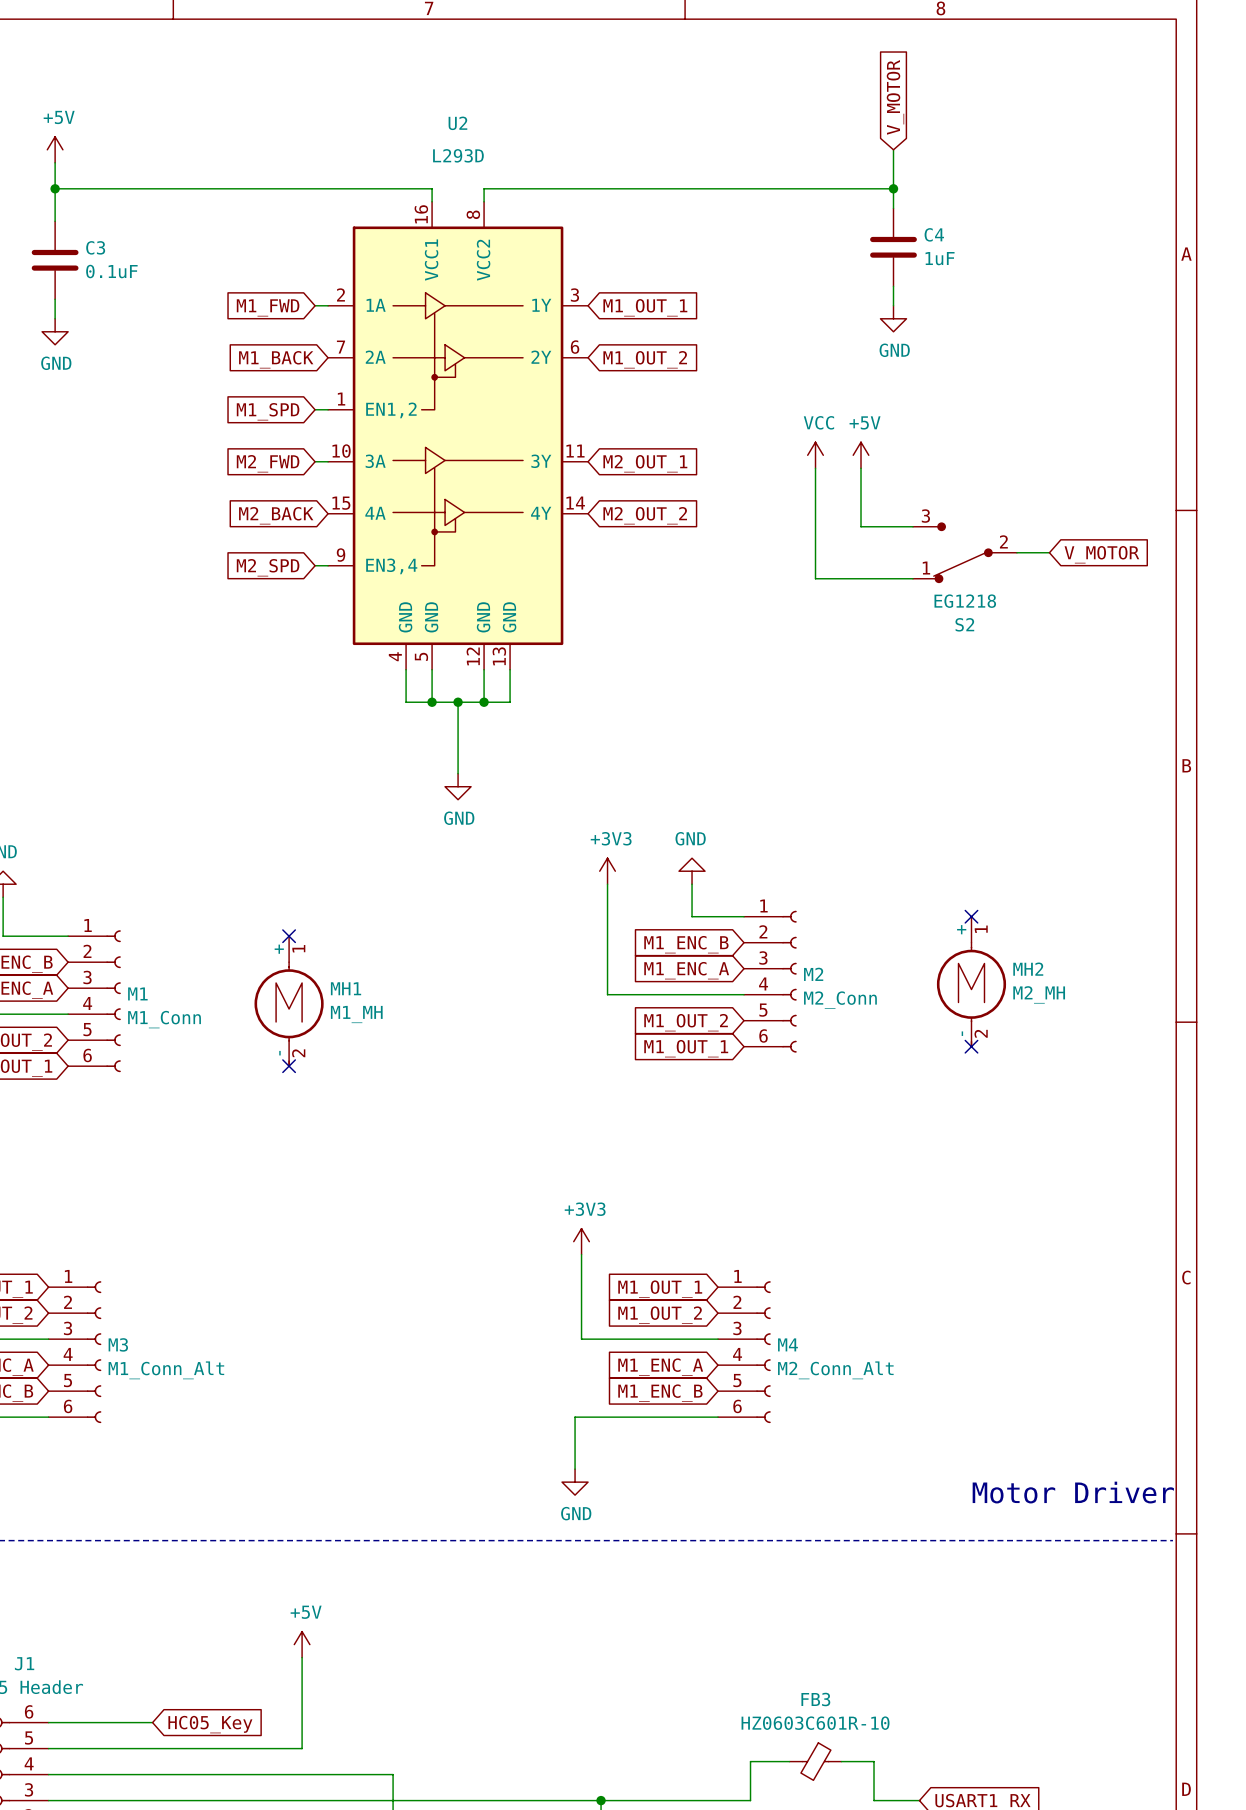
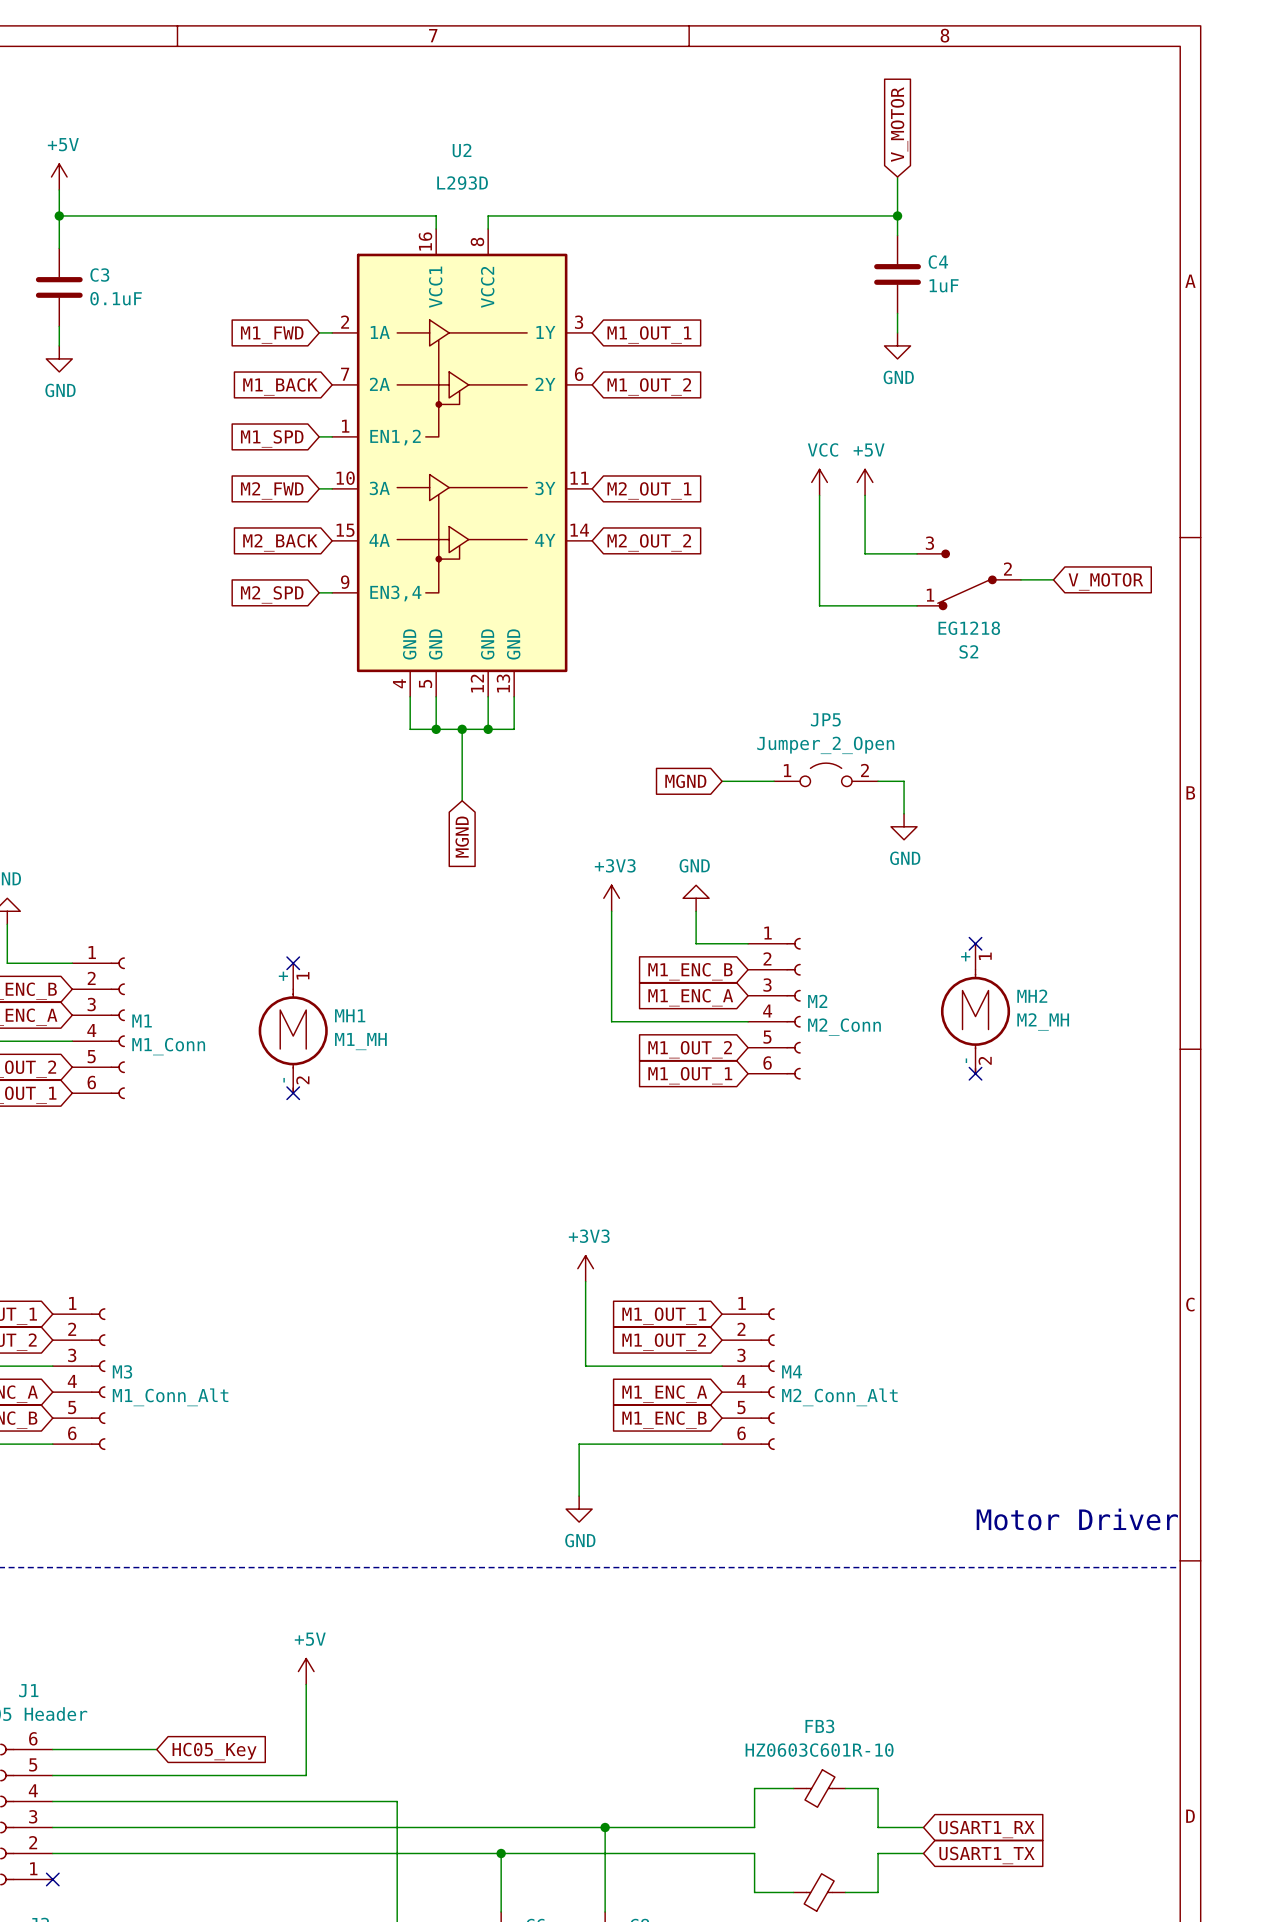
JP5: none -> Jumper_2_Open (826, 774)
global label: none -> MGND (685, 781)
wire: none -> (722, 781) (774, 781)
wire: none -> (878, 781) (904, 781) (904, 813)
power symbol: GND (458, 786) -> none
power symbol: none -> GND (904, 826)
global label: none -> MGND (462, 837)

